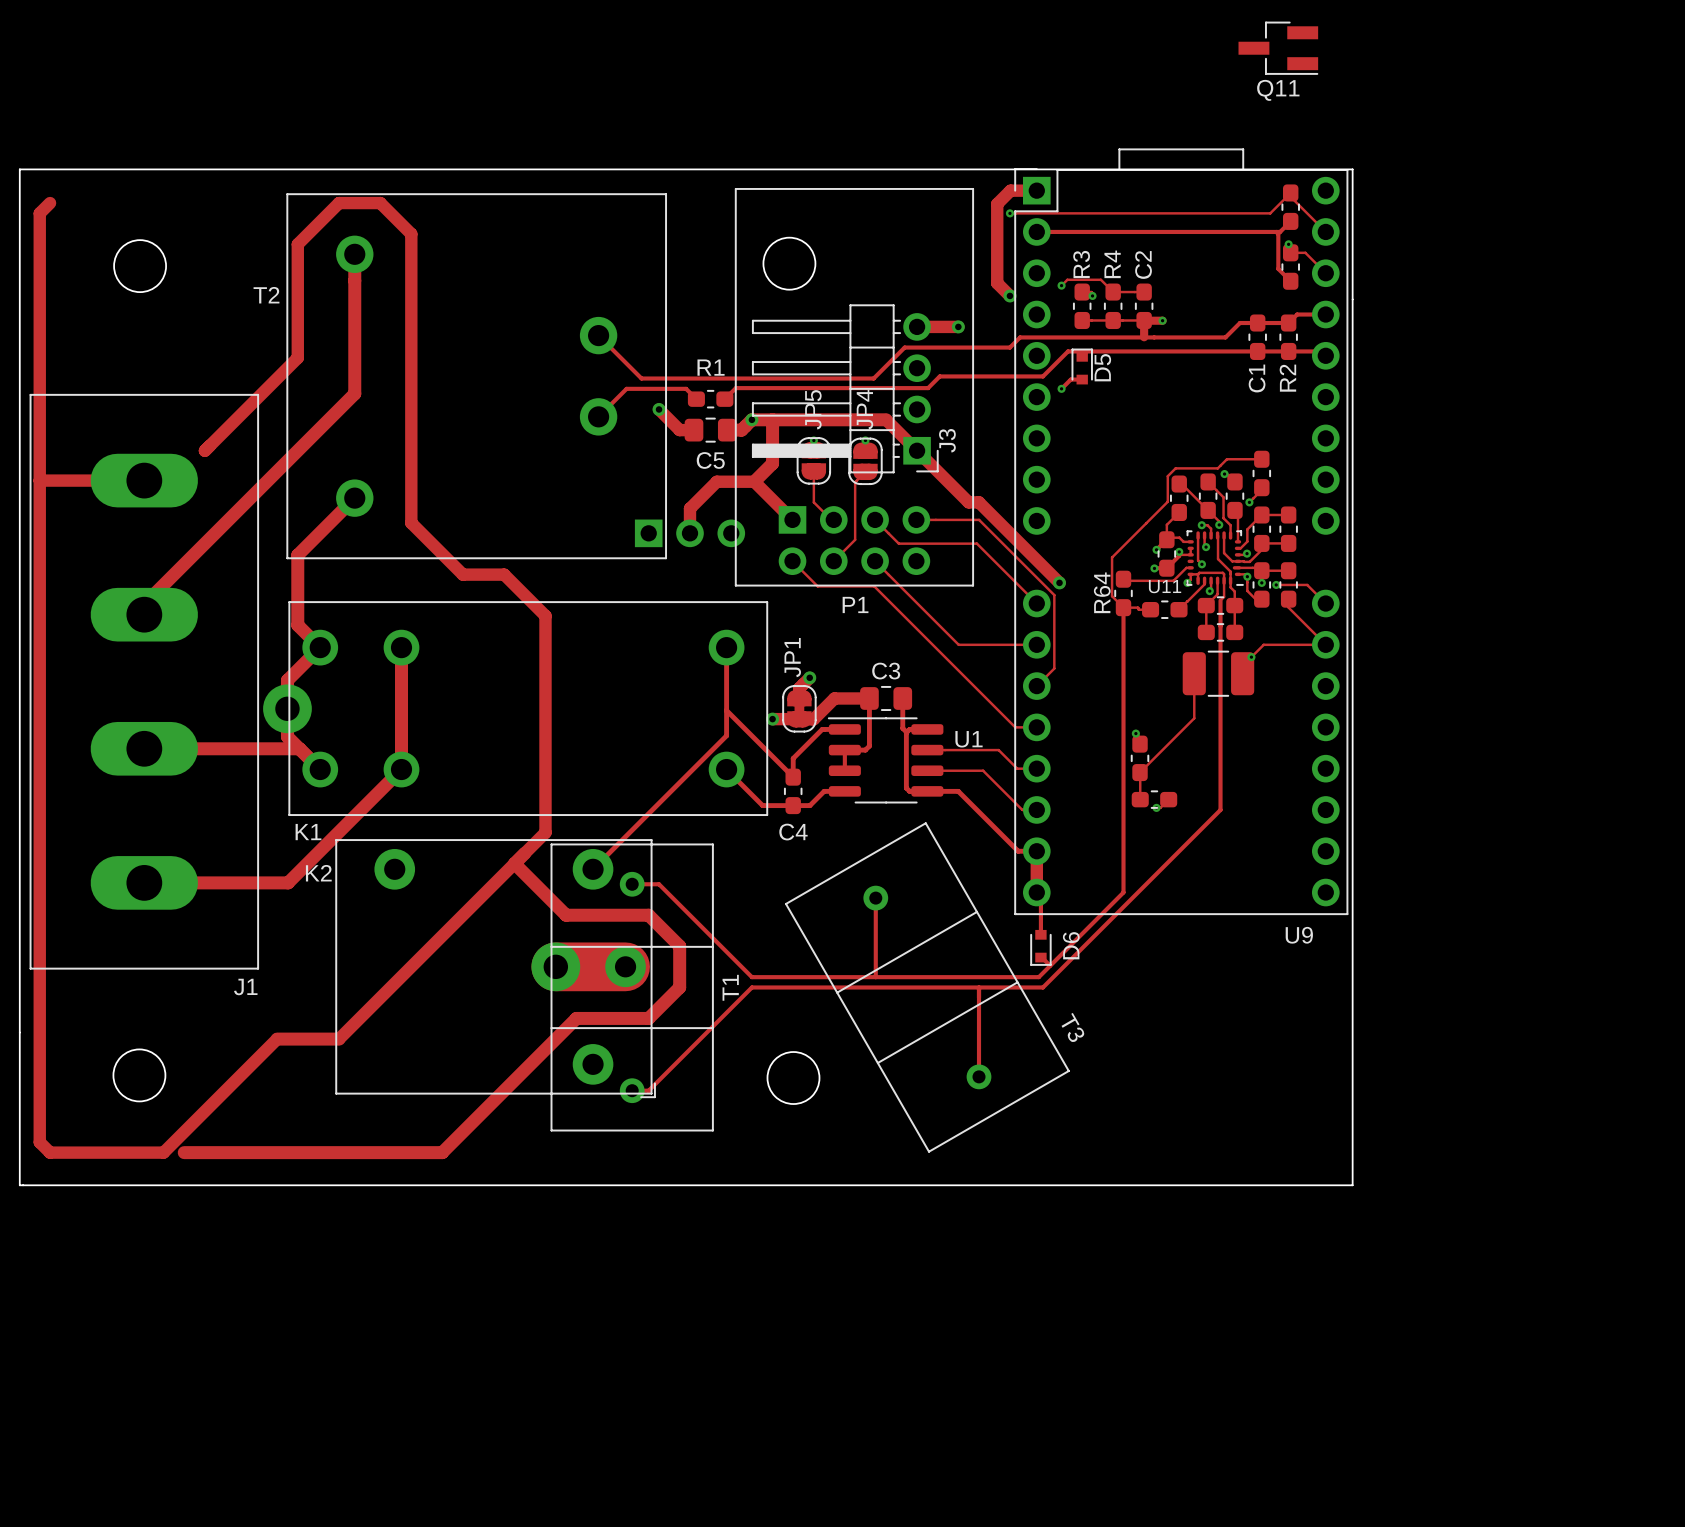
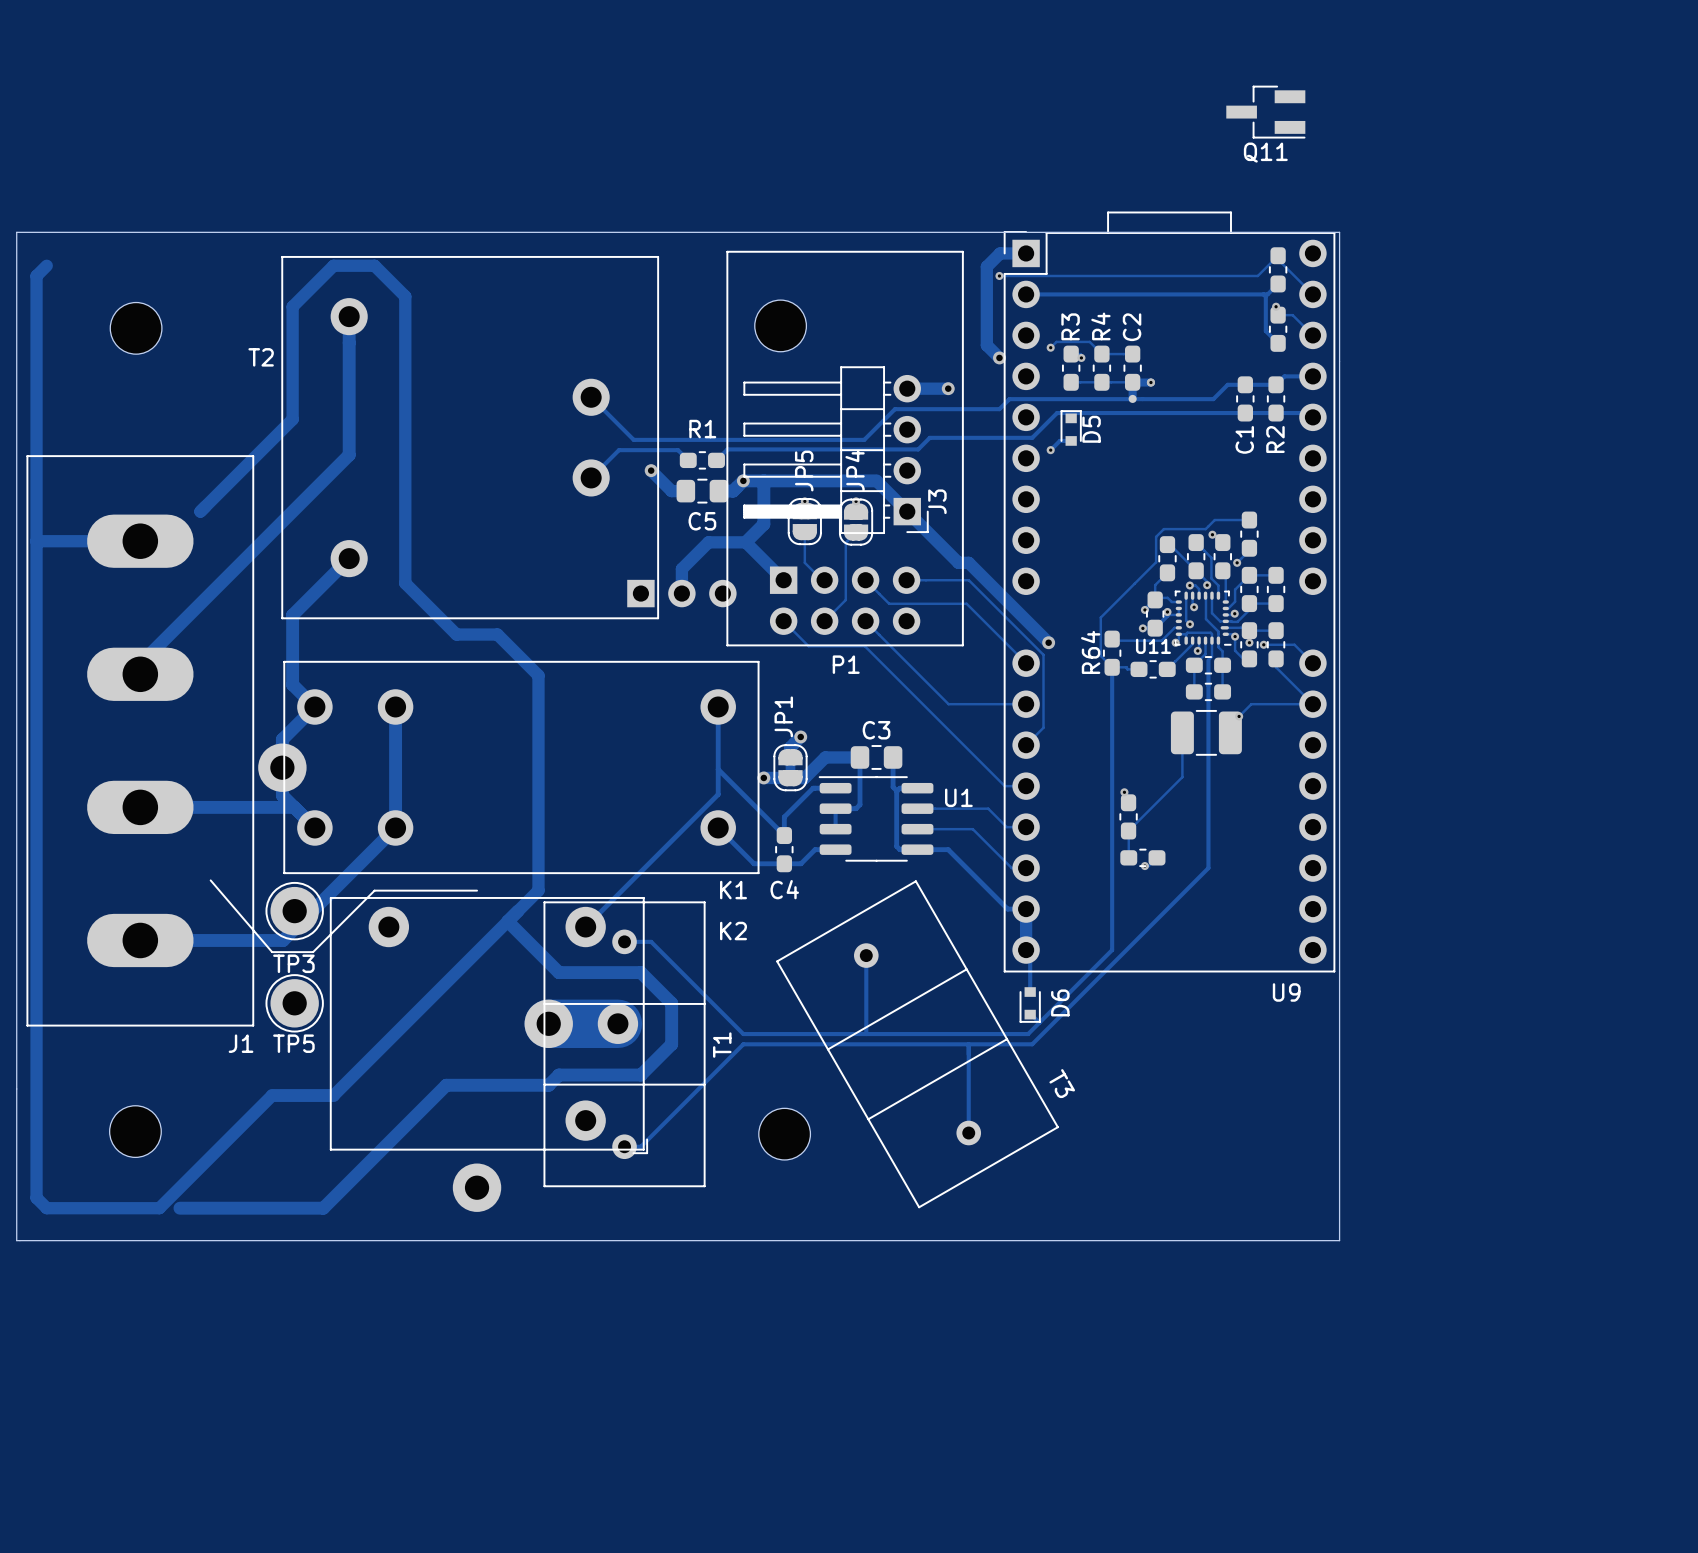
line: none -> (210, 880) (272, 952) (313, 952) (374, 890) (477, 890)
K1 name position: K1 (308, 832) -> K1 (733, 890)
TP3: none -> (294, 911)
K2 name position: K2 (318, 873) -> K2 (733, 931)
TP5: none -> (294, 1003)
track: (576, 1018) (442, 1152) (328, 1152) -> (569, 1075) (558, 1075) (548, 1085) (446, 1085) (323, 1208)
part: none -> (477, 1187)

